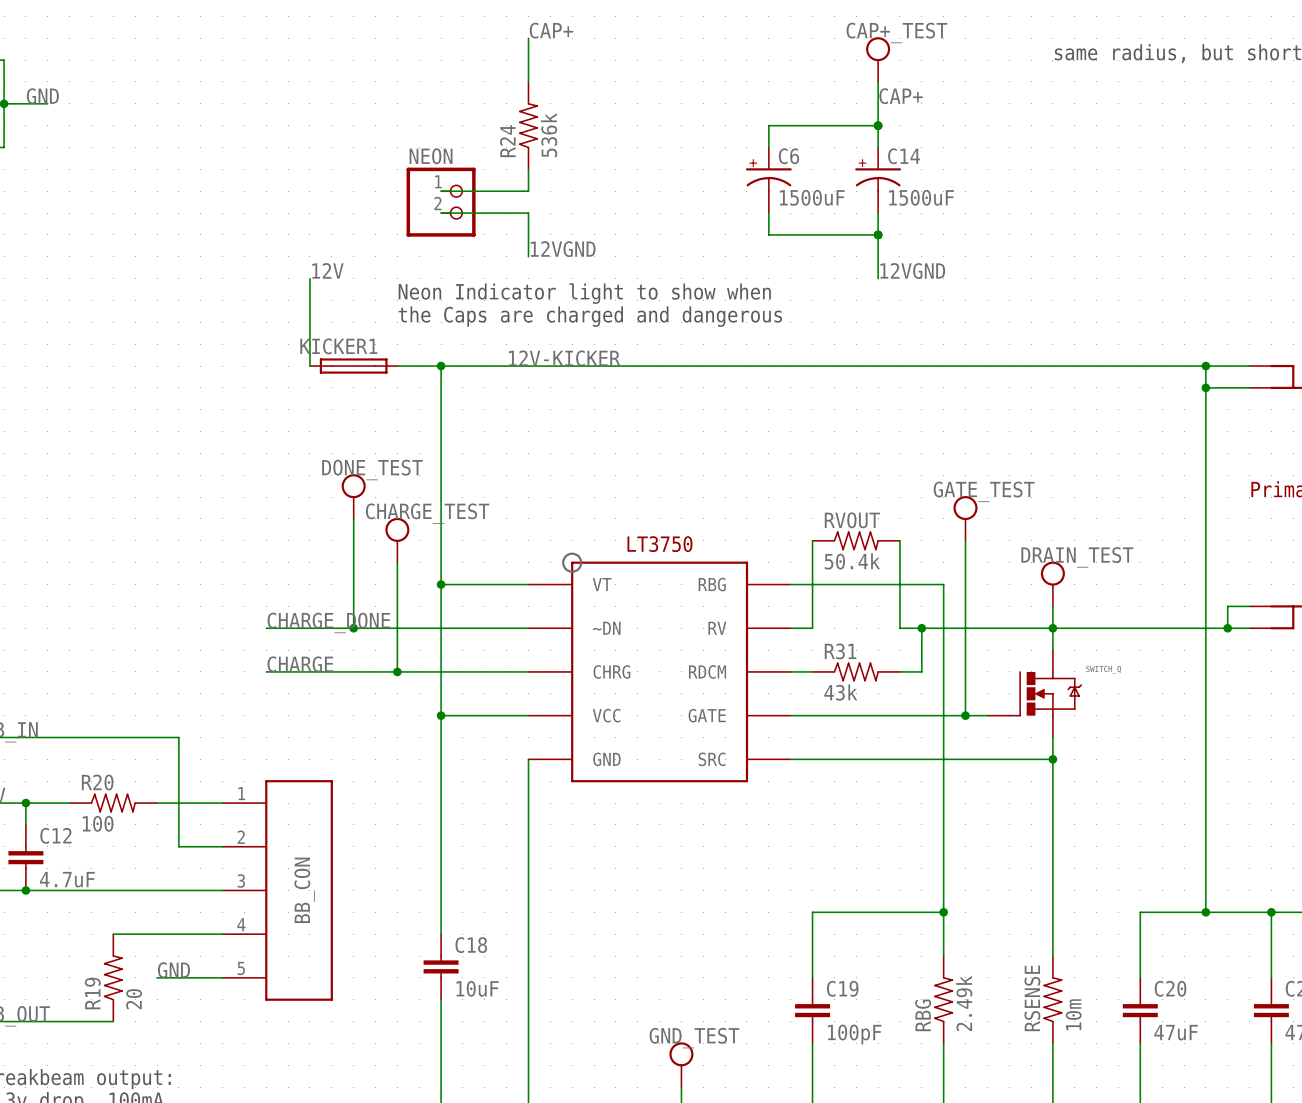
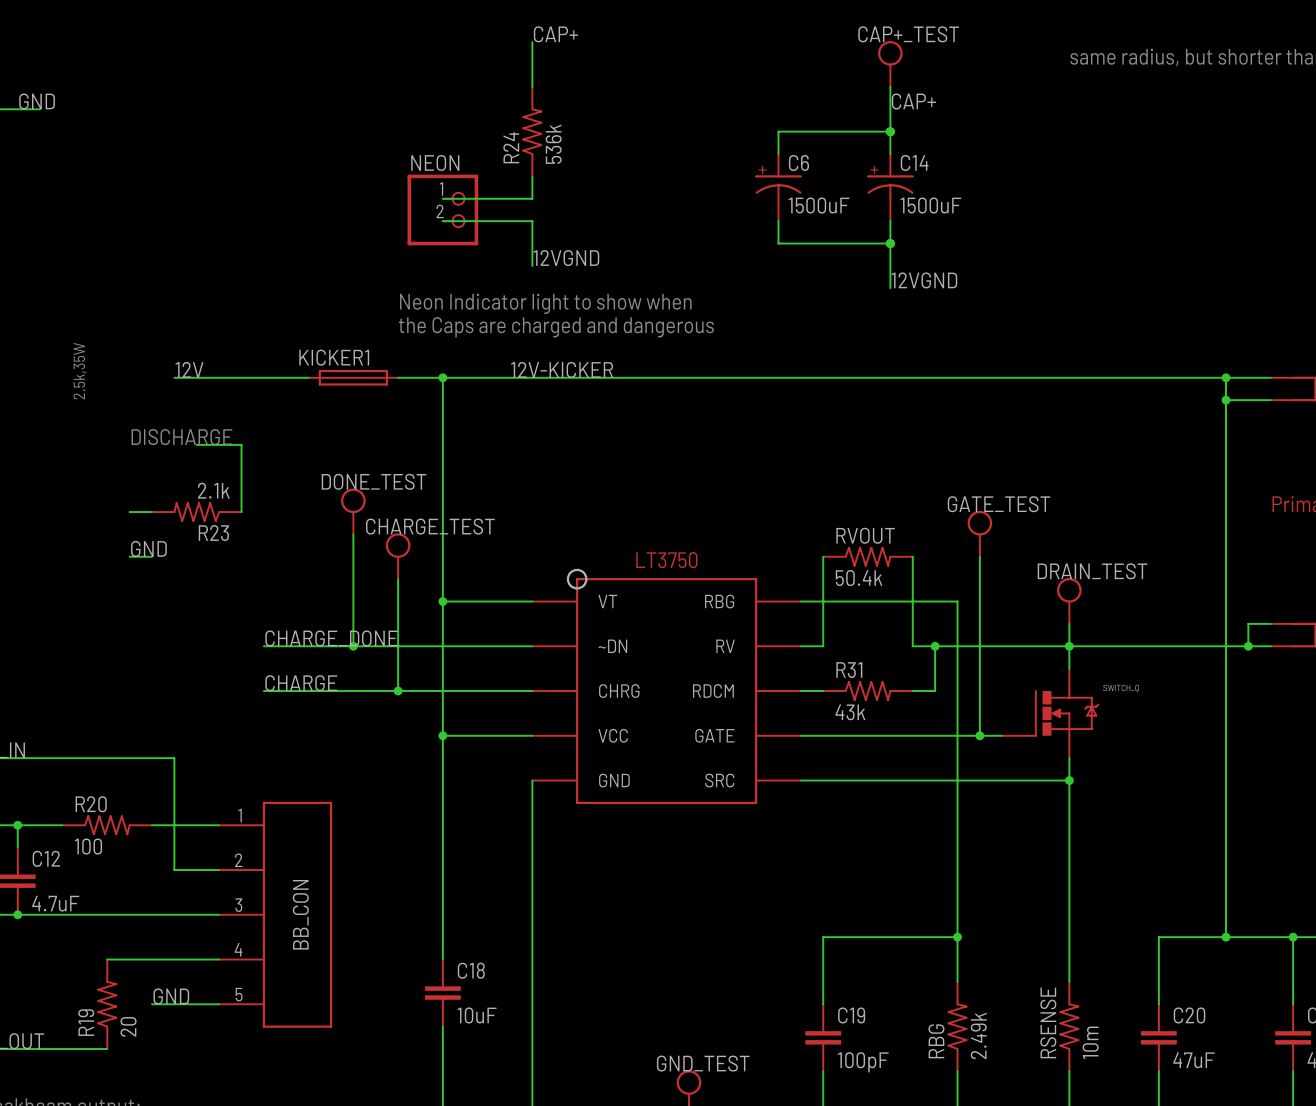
label position: 12V (327, 270) -> 12V (189, 369)
wire: (309, 278) (309, 366) -> (174, 377) (308, 377)
text: none -> 2.5k,35W (79, 371)
text: none -> DISCHARGE (181, 437)
wire: none -> (196, 444) (241, 444) (241, 512)
wire: none -> (129, 512) (152, 512)
R23: none -> 2.1k (196, 512)
label: none -> GND (148, 548)
wire: none -> (129, 556) (152, 556)

